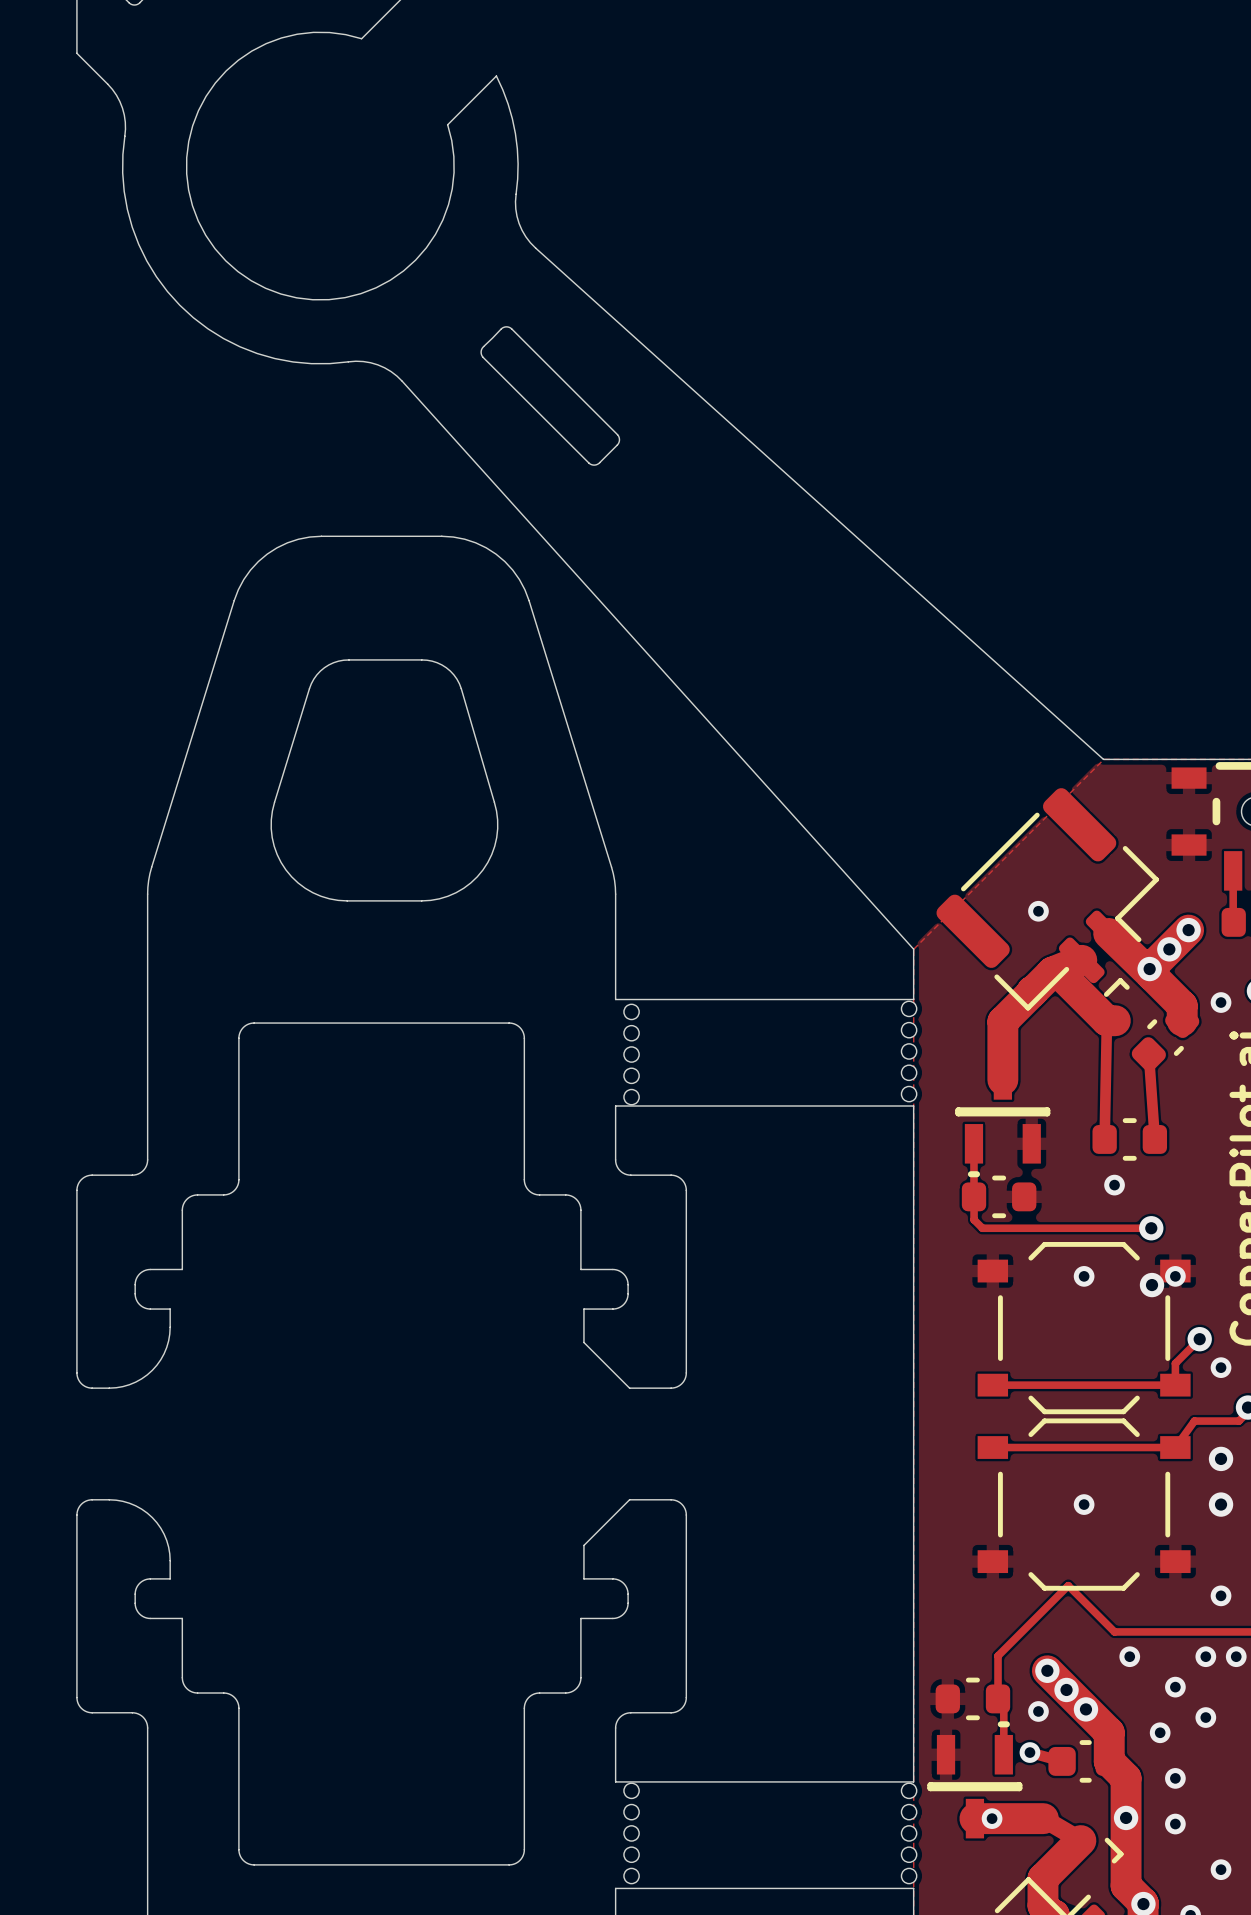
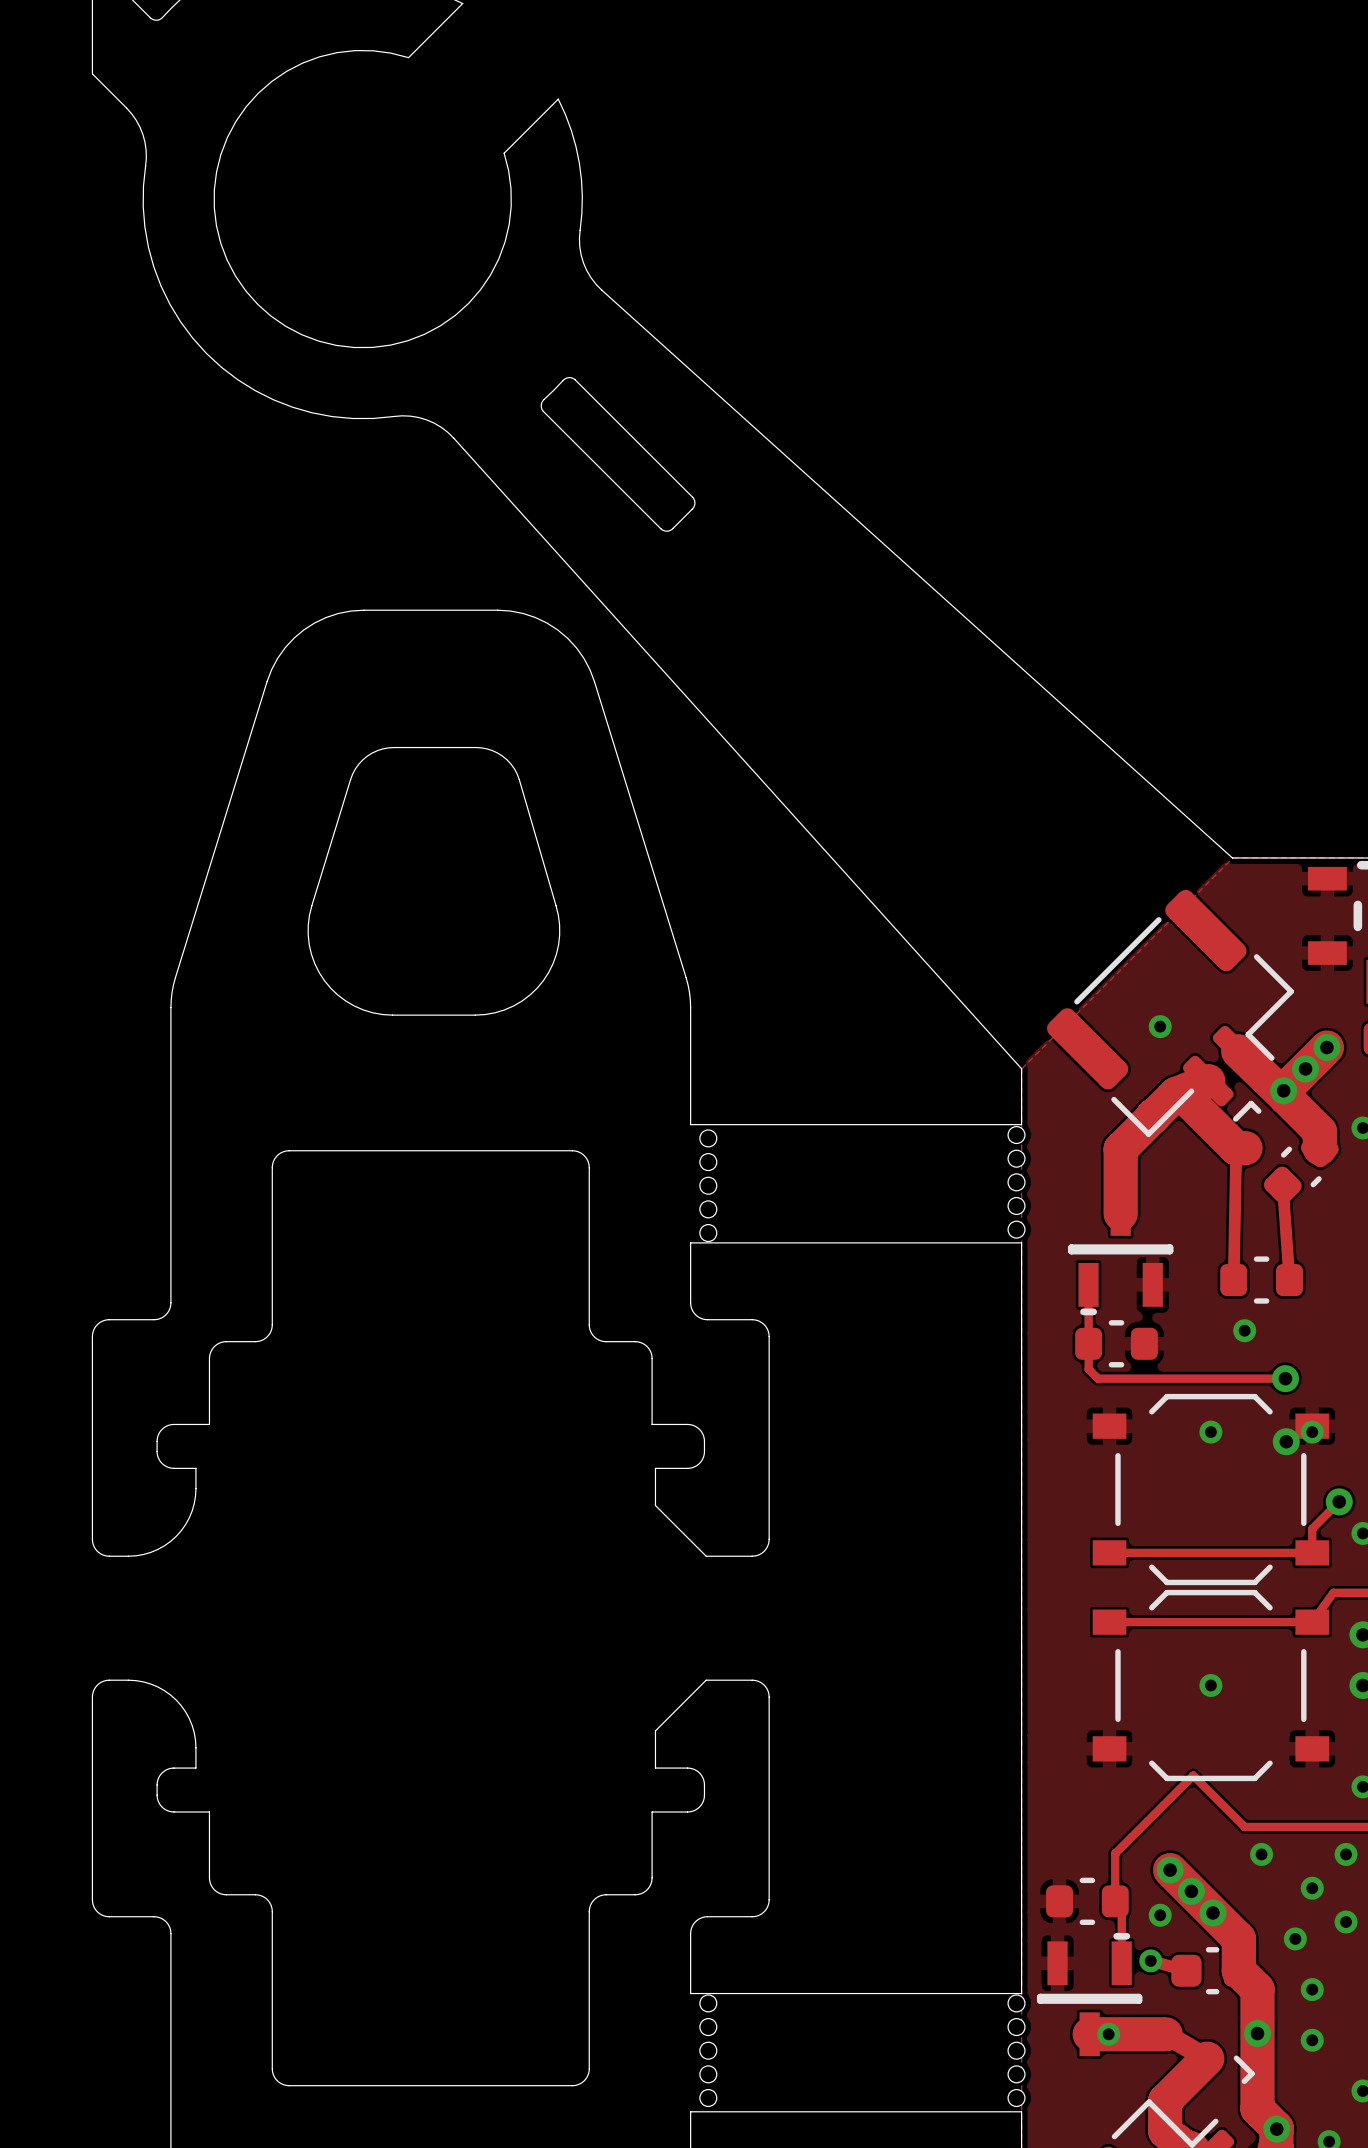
part footprint: [955, 1060, 1051, 1178] -> [1067, 1191, 1174, 1316]
part footprint: [927, 1721, 1023, 1839] -> [1036, 1932, 1143, 2057]

